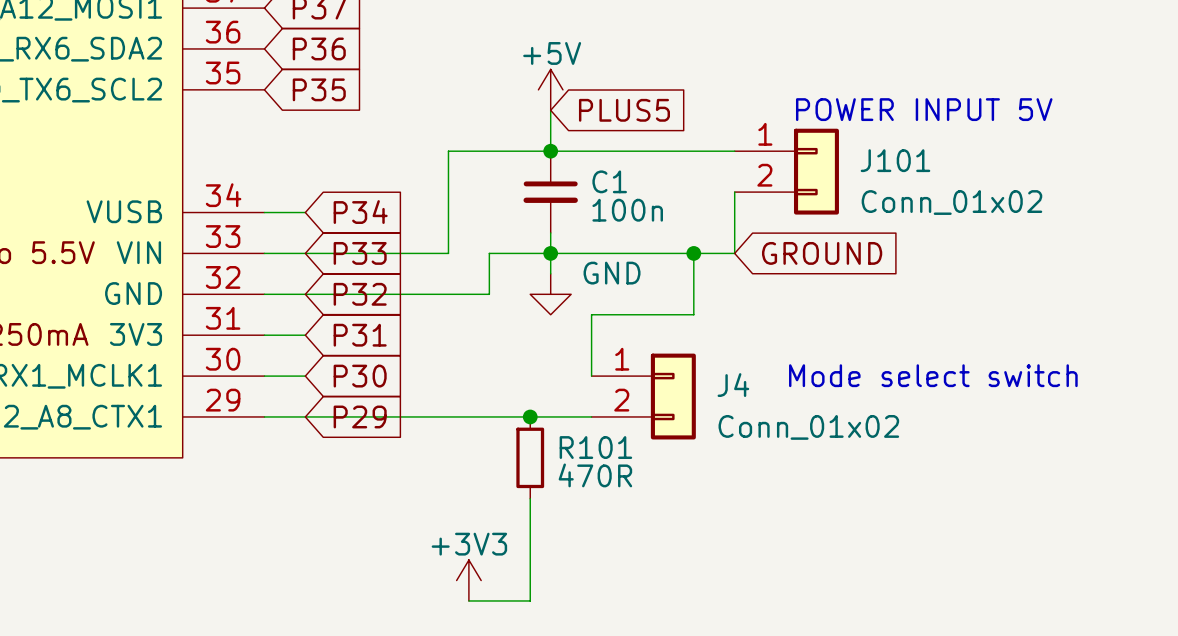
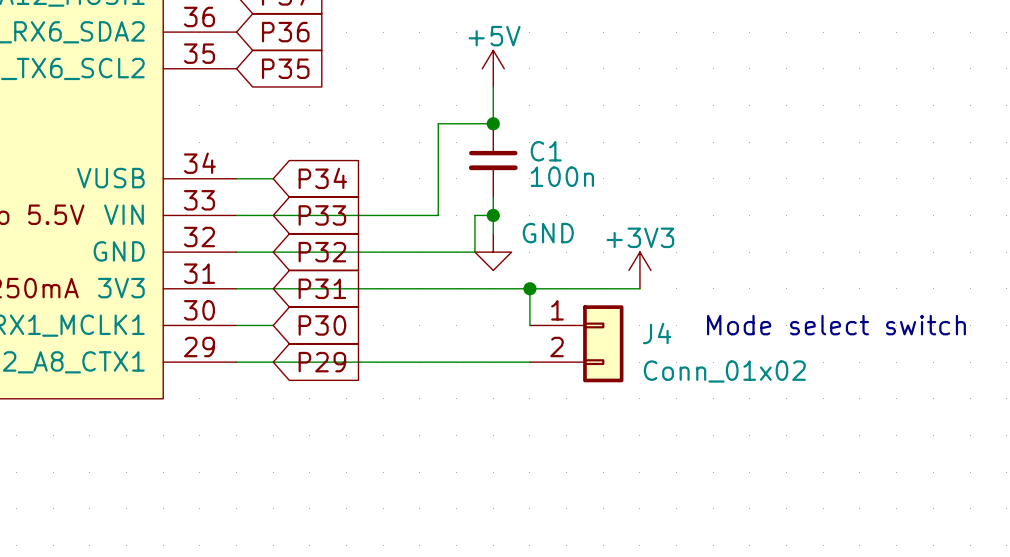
text: POWER INPUT 5V (924, 109) -> none
global label: PLUS5 (624, 110) -> none
wire: (489, 151) (448, 151) (448, 253) -> (438, 123) (438, 215) (401, 215)
wire: (550, 151) (734, 151) -> none
J101: Conn_01x02 (786, 171) -> none
wire: (734, 192) (734, 253) (550, 253) -> none
wire: (530, 253) (489, 253) (489, 294) -> (474, 215) (474, 252) (438, 252)
wire: (693, 253) (693, 314) (591, 314) (591, 335) -> none
junction: (693, 253) -> none
global label: GROUND (822, 253) -> none
wire: none -> (273, 288) (639, 288)
junction: none -> (529, 288)
junction: (530, 416) -> none
R101: 470R (530, 457) -> none
wire: (530, 498) (530, 600) (468, 600) -> none
power symbol position: +3V3 (468, 580) -> +3V3 (639, 270)

